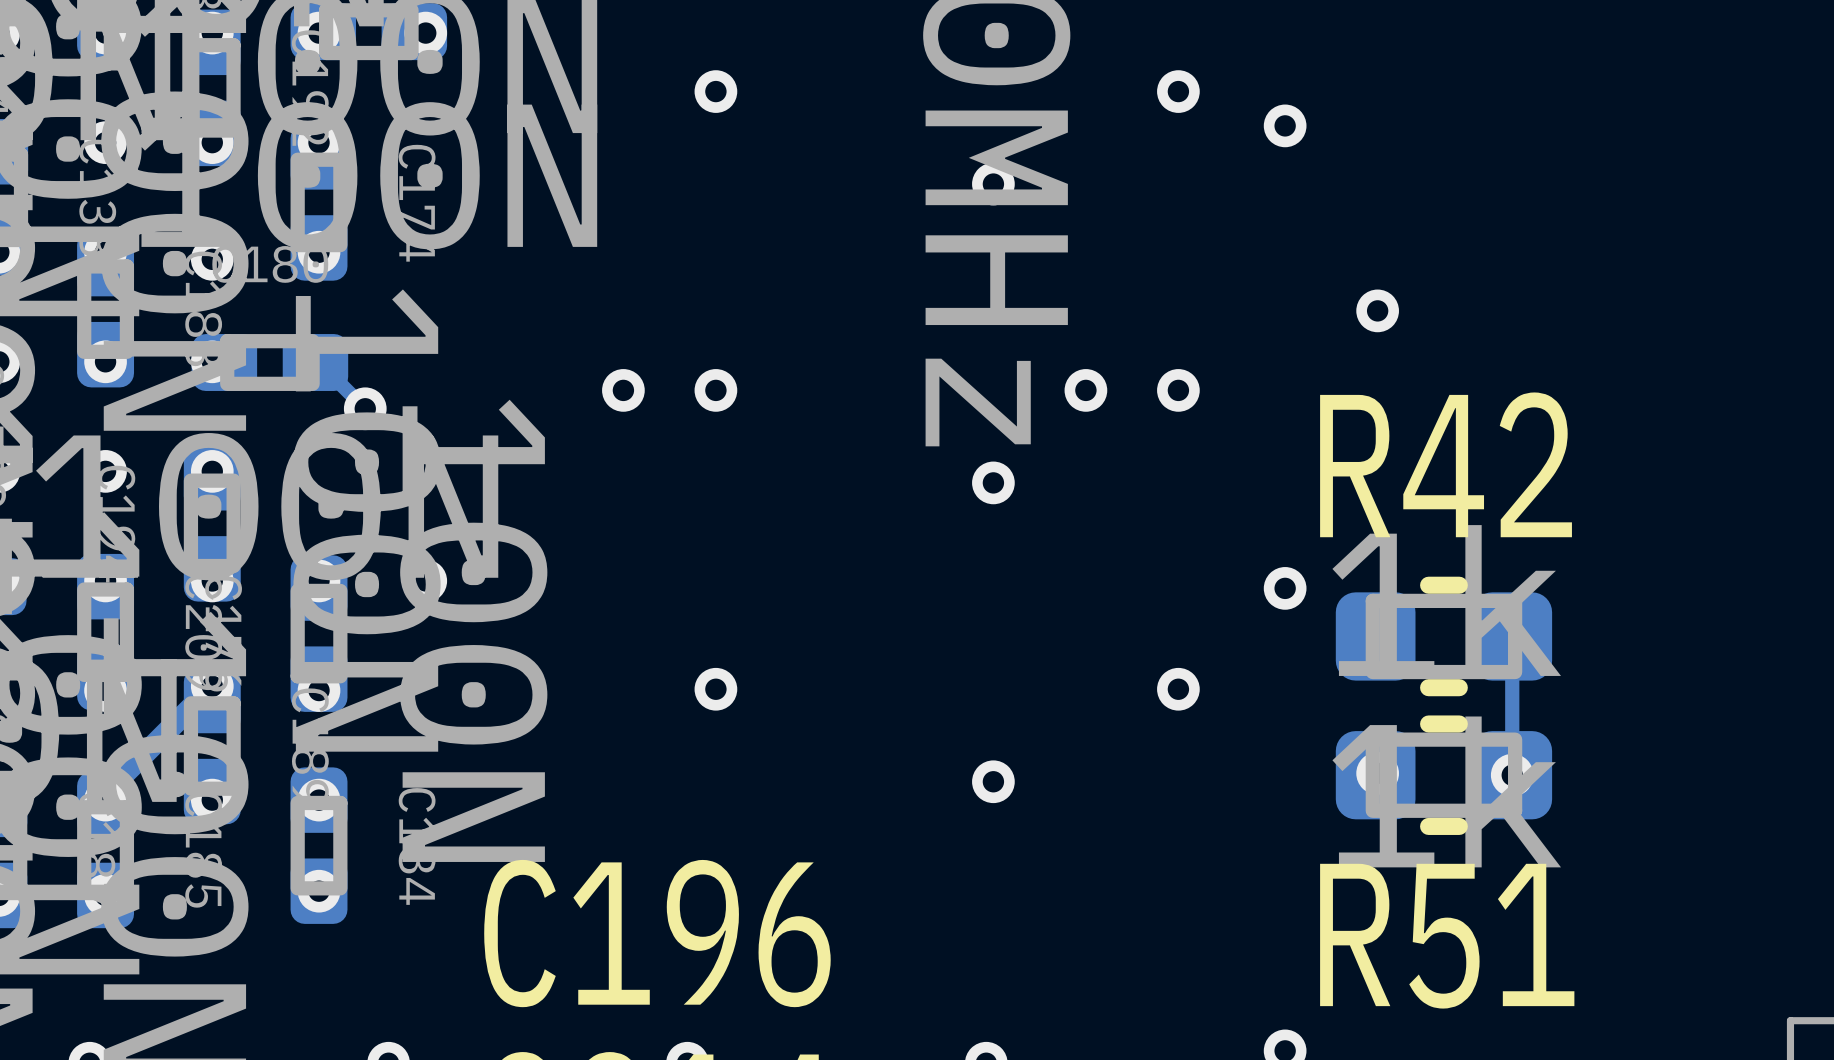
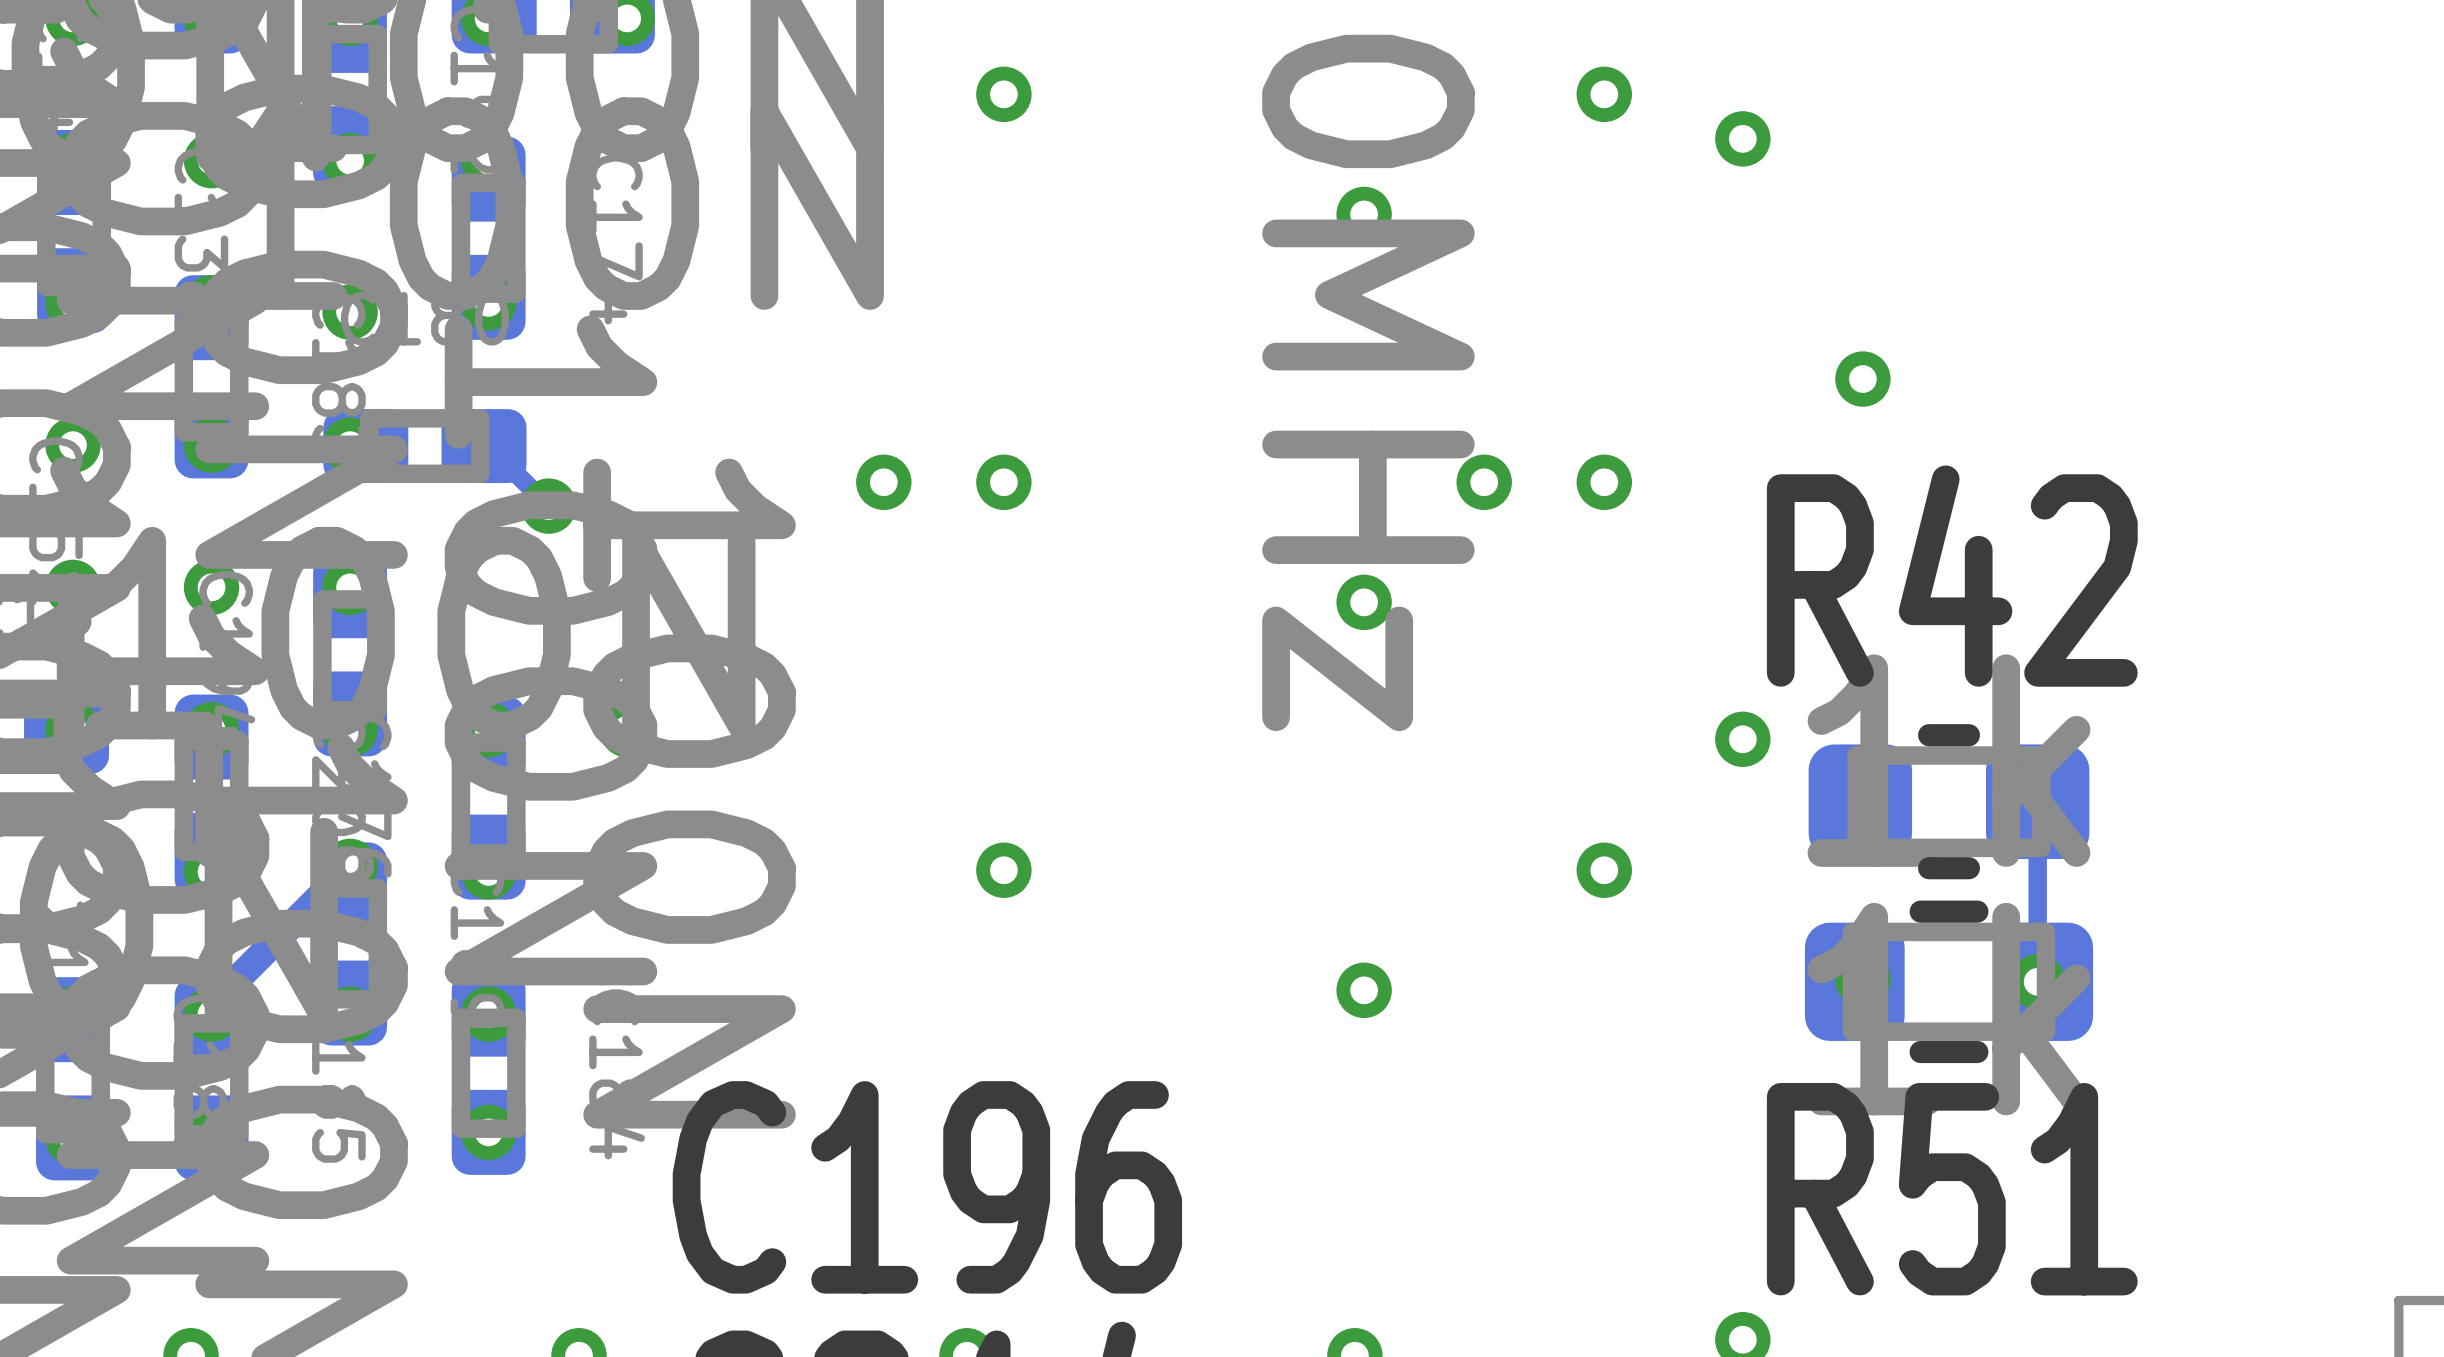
R51 footprint: [1335, 715, 1553, 835] -> [1804, 900, 2094, 1064]

